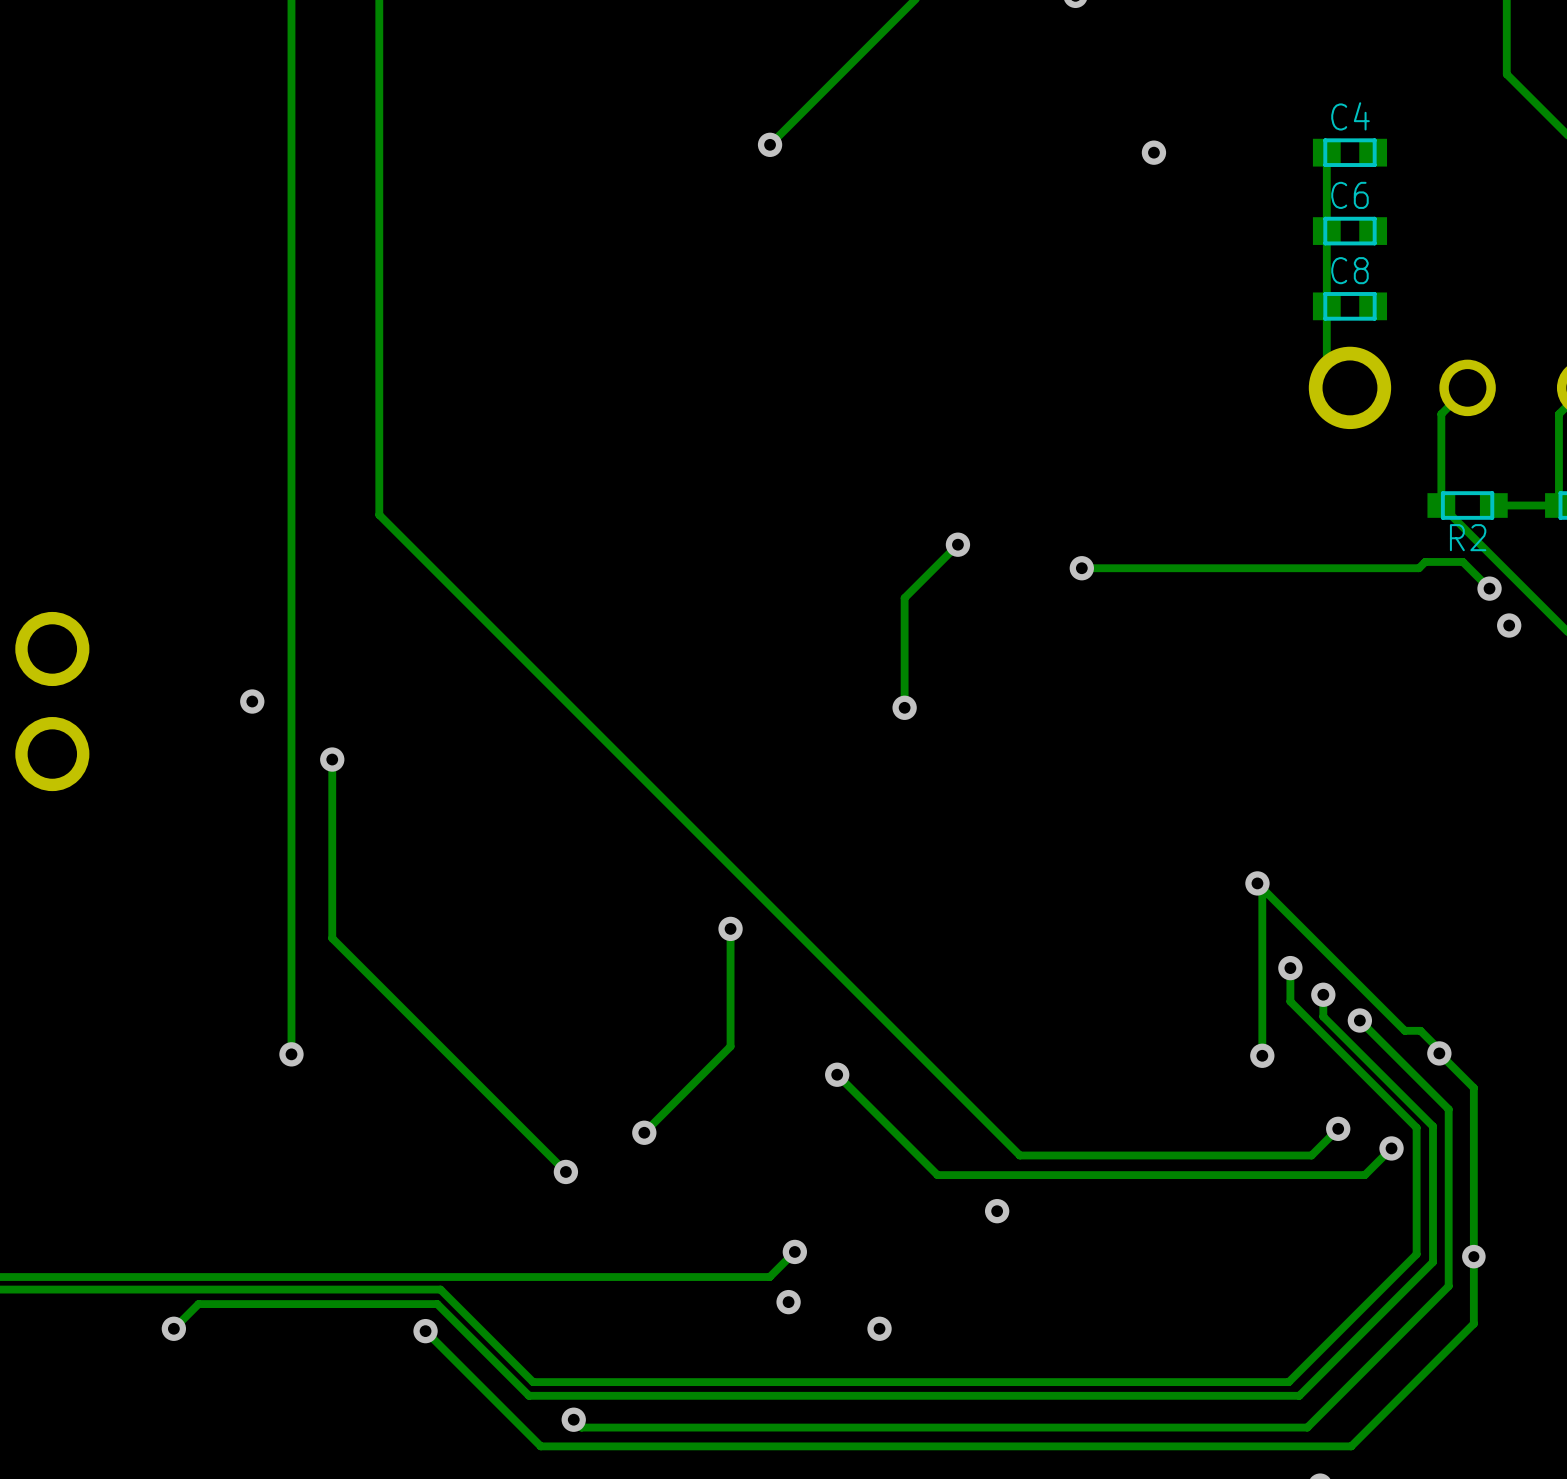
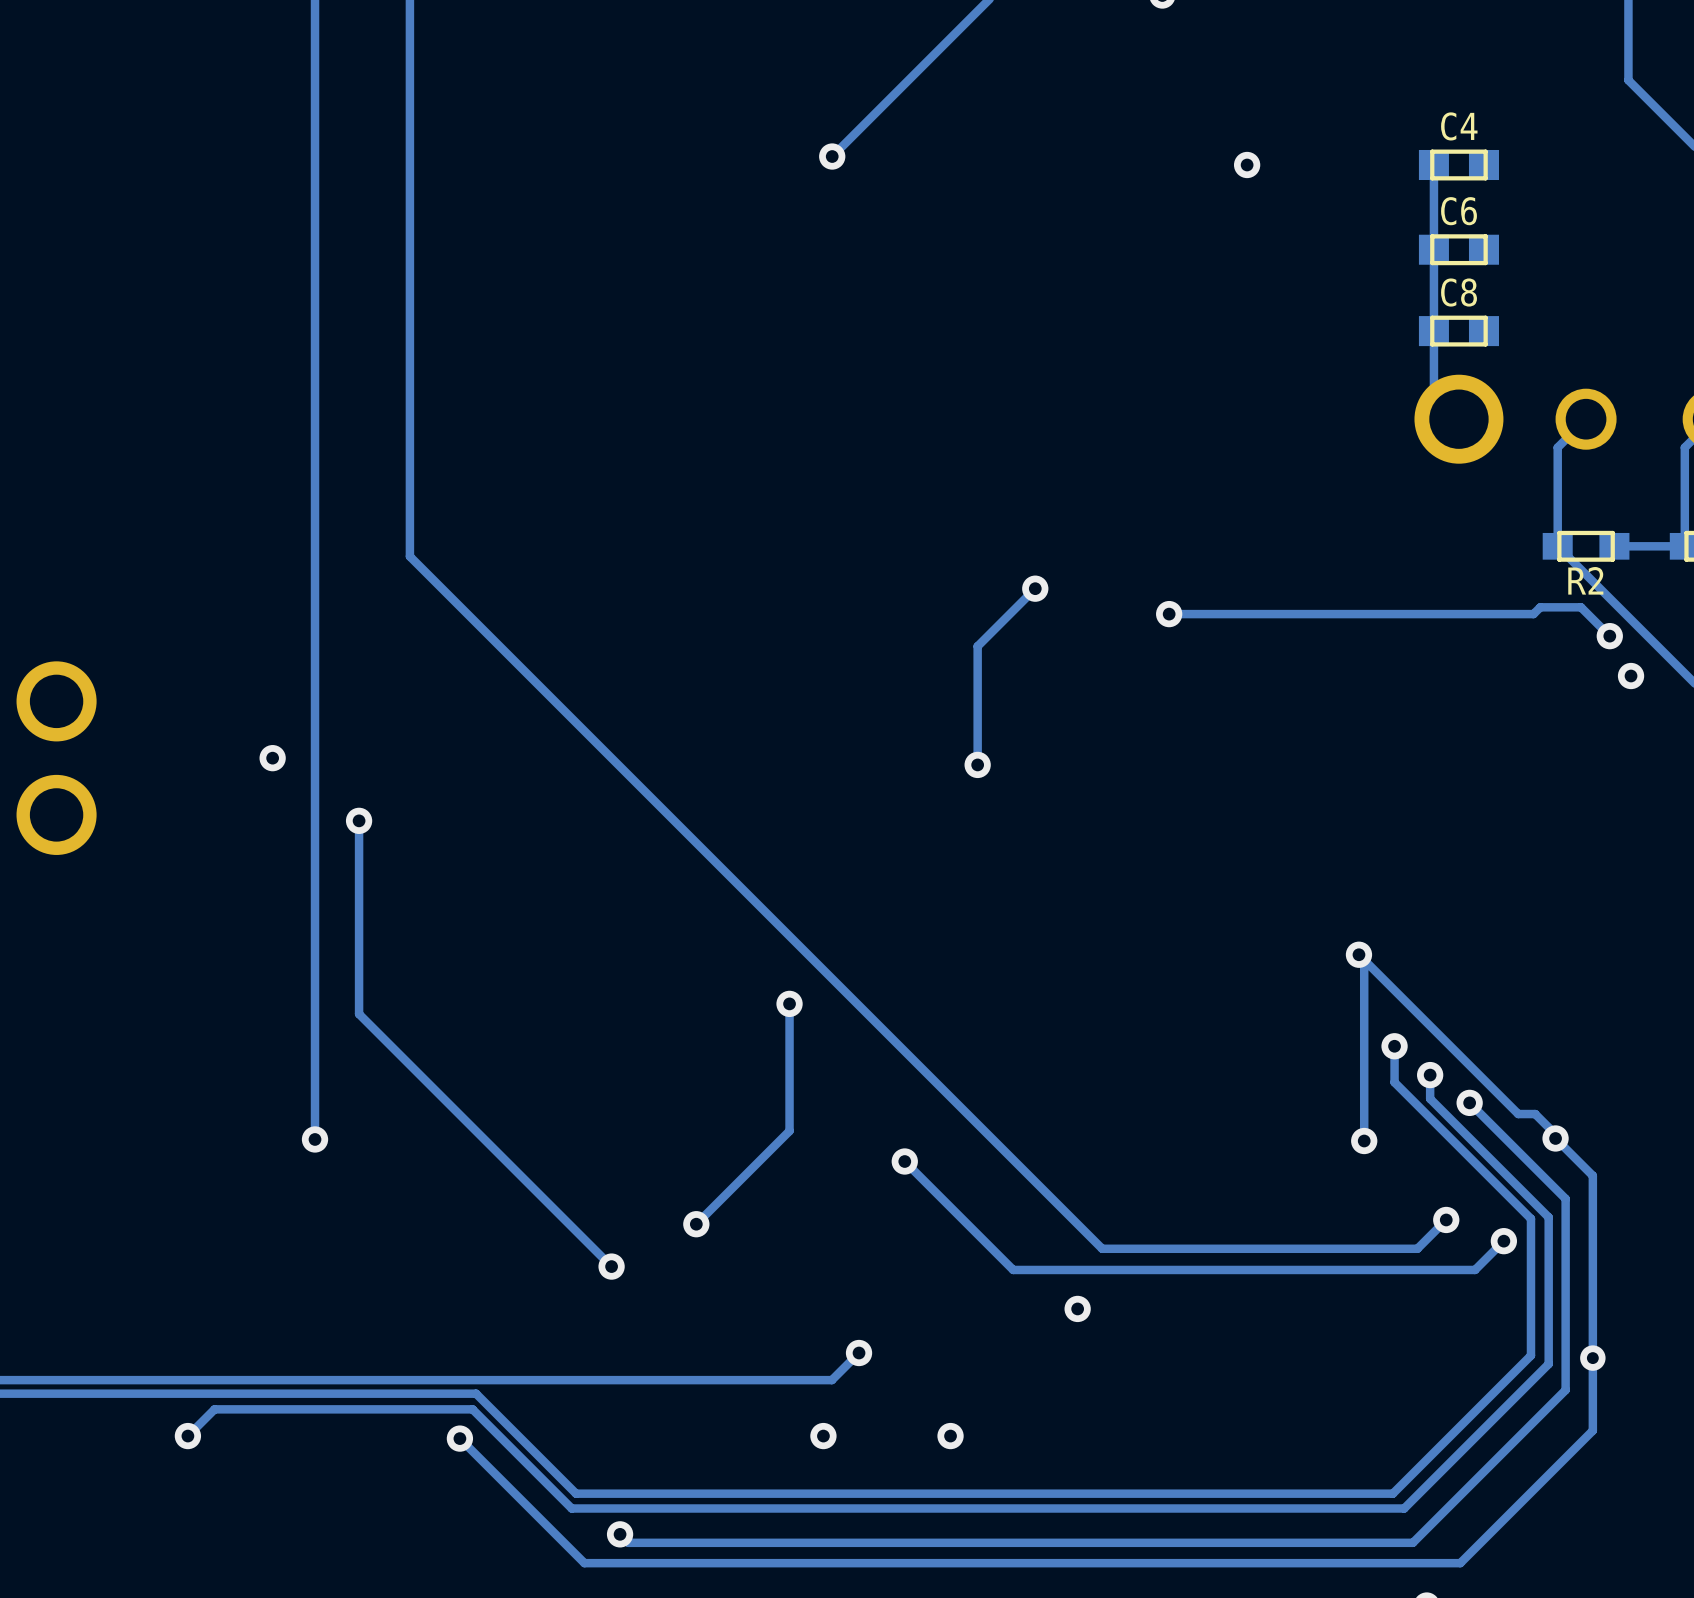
via position: (788, 1302) -> (823, 1436)

